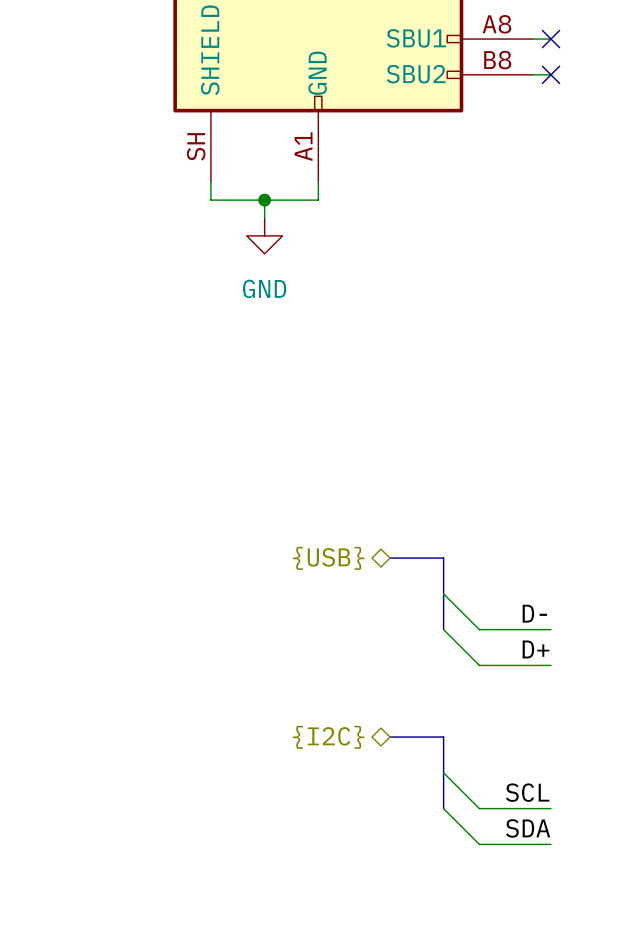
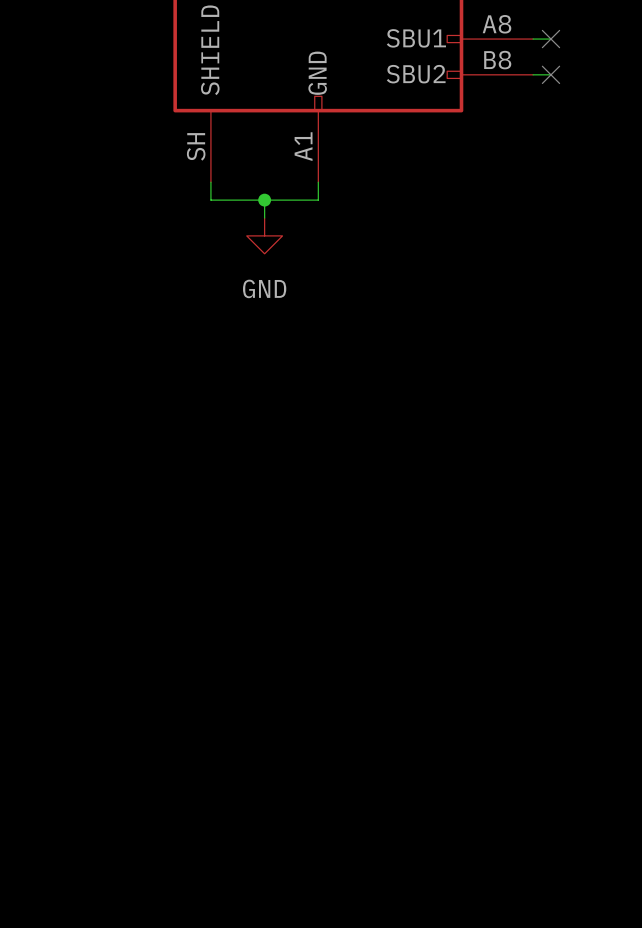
hierarchical label: {USB} (328, 558) -> none
bus: (389, 558) (443, 558) (443, 629) -> none
wire: (443, 593) (479, 629) (550, 629) -> none
label: D- (534, 613) -> none
wire: (443, 629) (479, 665) (550, 665) -> none
label: D+ (536, 649) -> none
hierarchical label: {I2C} (328, 737) -> none
bus: (389, 737) (443, 737) (443, 808) -> none
wire: (443, 772) (479, 808) (550, 808) -> none
label: SCL (527, 792) -> none
wire: (443, 808) (479, 844) (550, 844) -> none
label: SDA (528, 828) -> none

